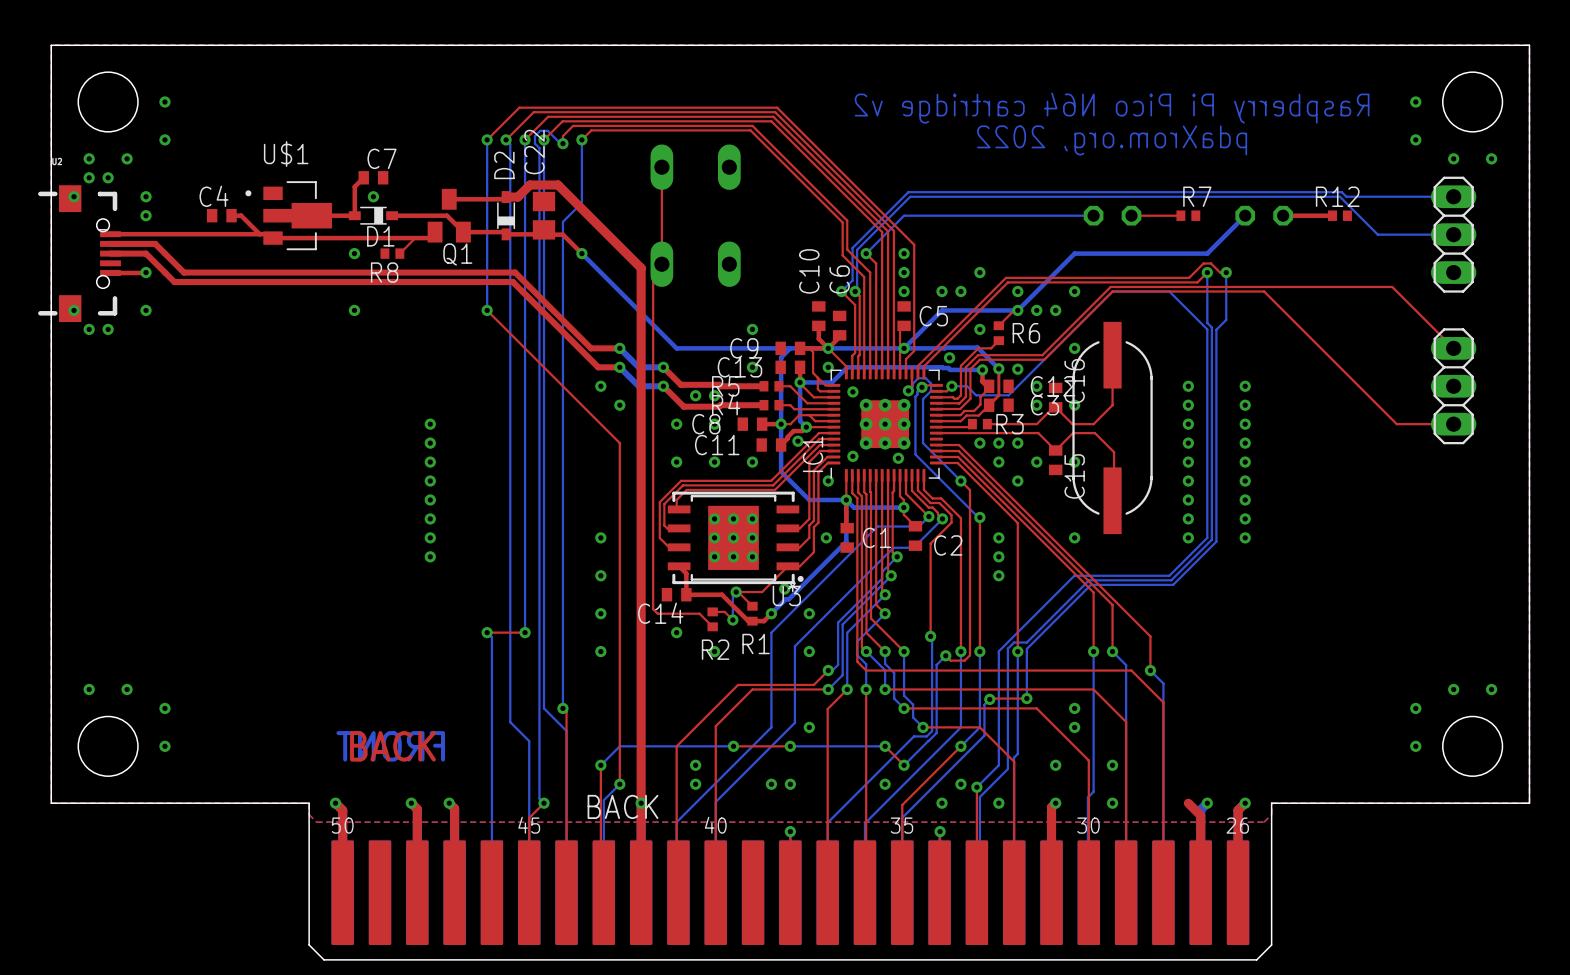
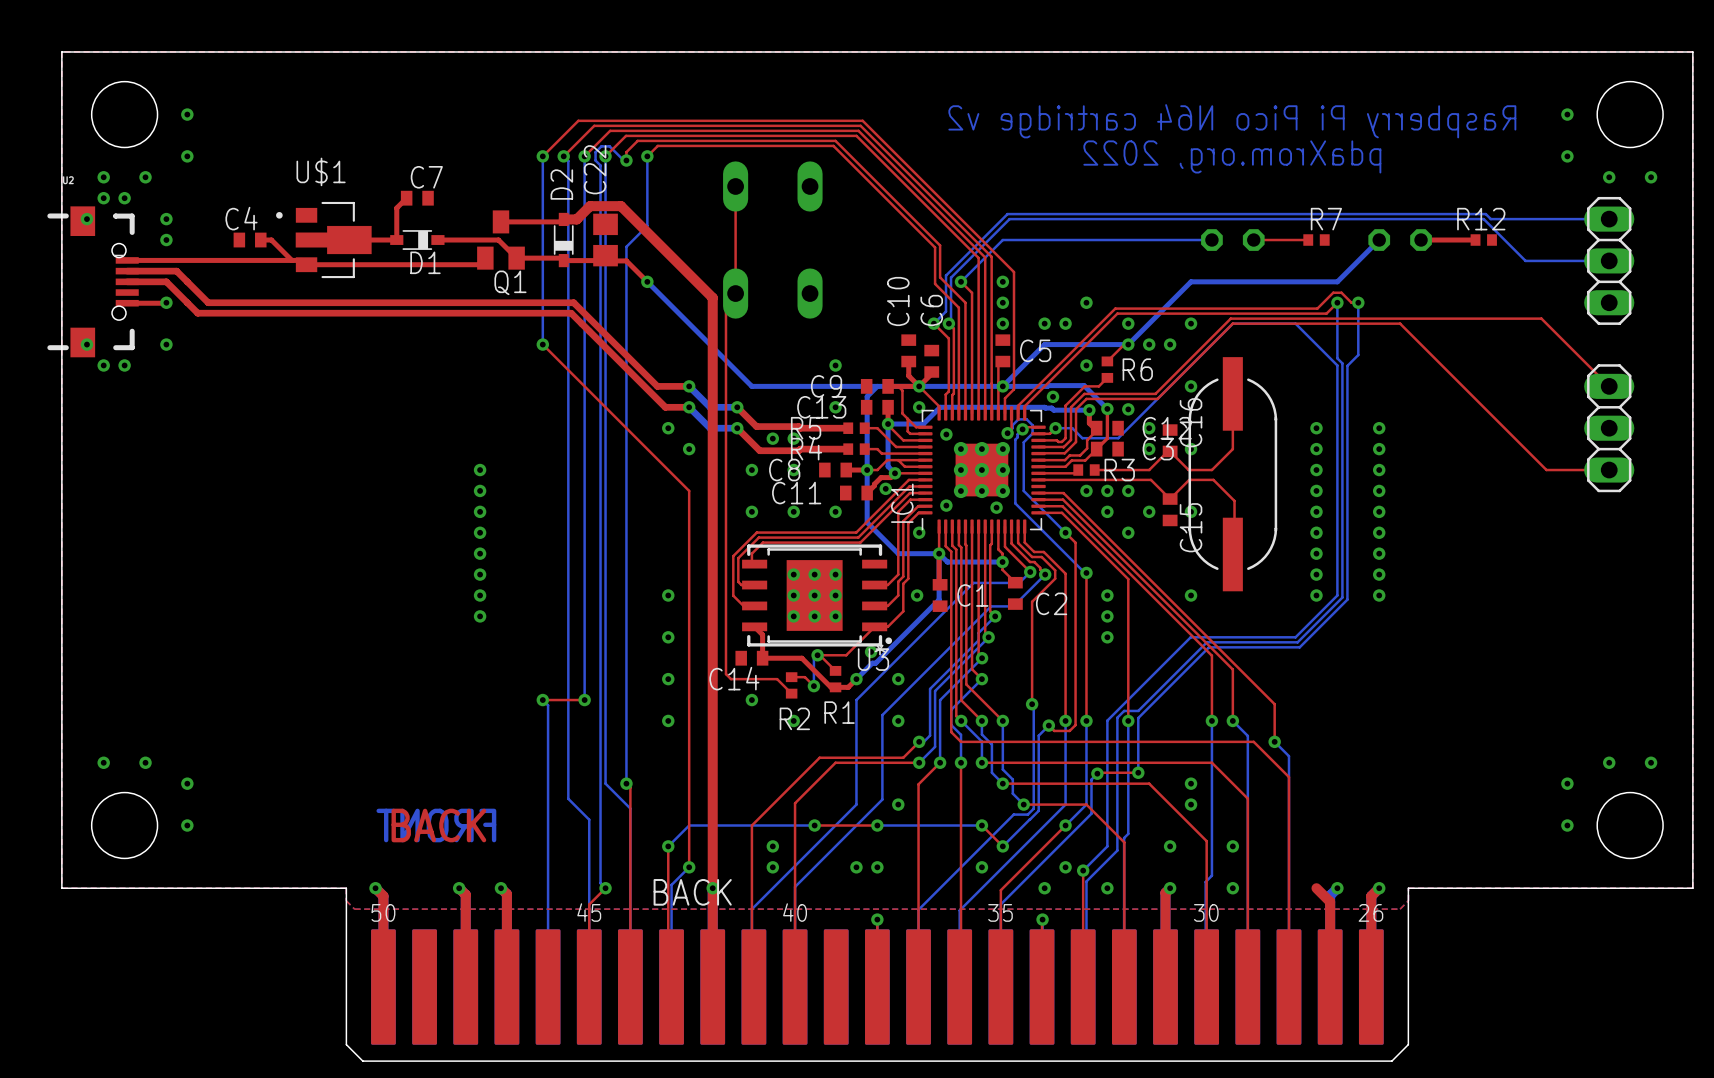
via: (373, 196) -> none
top track: (429, 238) (415, 238) (399, 253) -> none
via: (354, 253) -> none
R8: (392, 253) -> none
via: (354, 310) -> none

